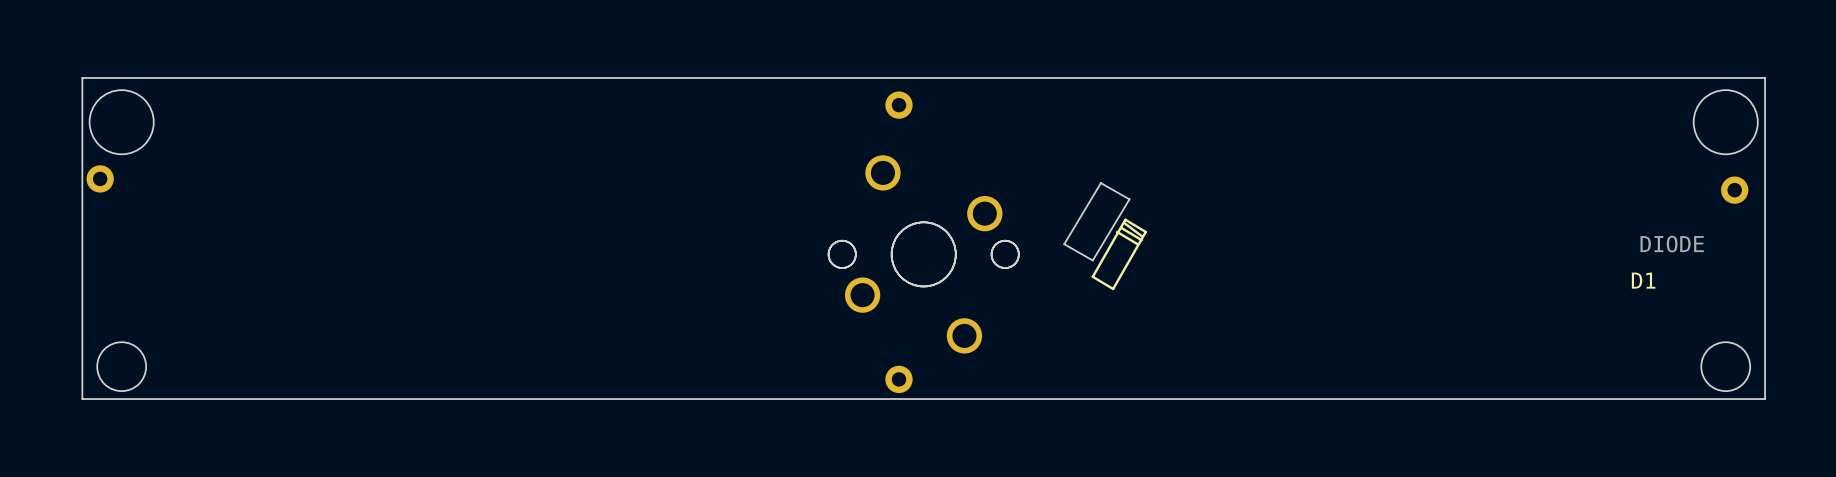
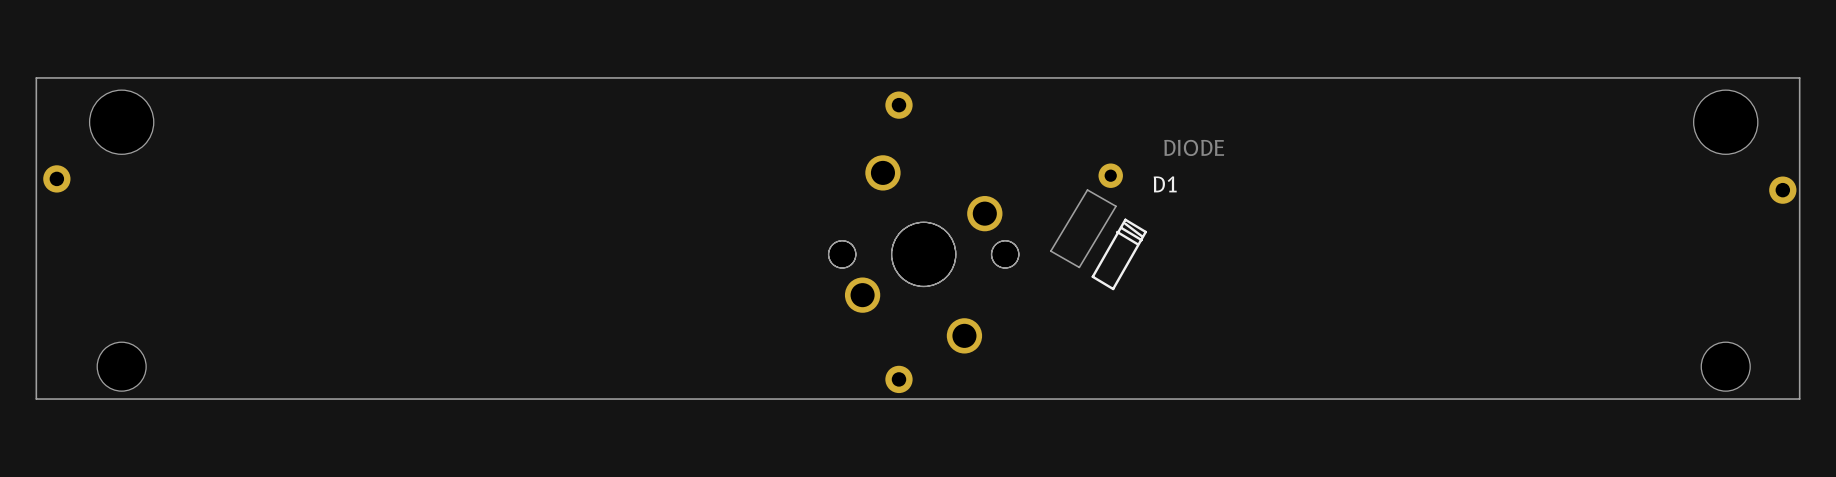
board edge: (82, 77) (82, 399) -> (82, 77) (36, 77) (36, 399) (82, 399)
board edge: (1765, 77) (1765, 399) -> (1765, 77) (1799, 77) (1799, 399) (1765, 399)
D1 footprint: [86, 91, 1749, 394] -> [43, 91, 1797, 394]
board edge: (1100, 183) (1064, 244) (1092, 260) (1129, 199) (1100, 183) -> (1087, 190) (1050, 251) (1079, 267) (1116, 206) (1087, 190)
D1 value position: DIODE (1672, 244) -> DIODE (1194, 147)
D1 name position: D1 (1643, 280) -> D1 (1165, 184)

